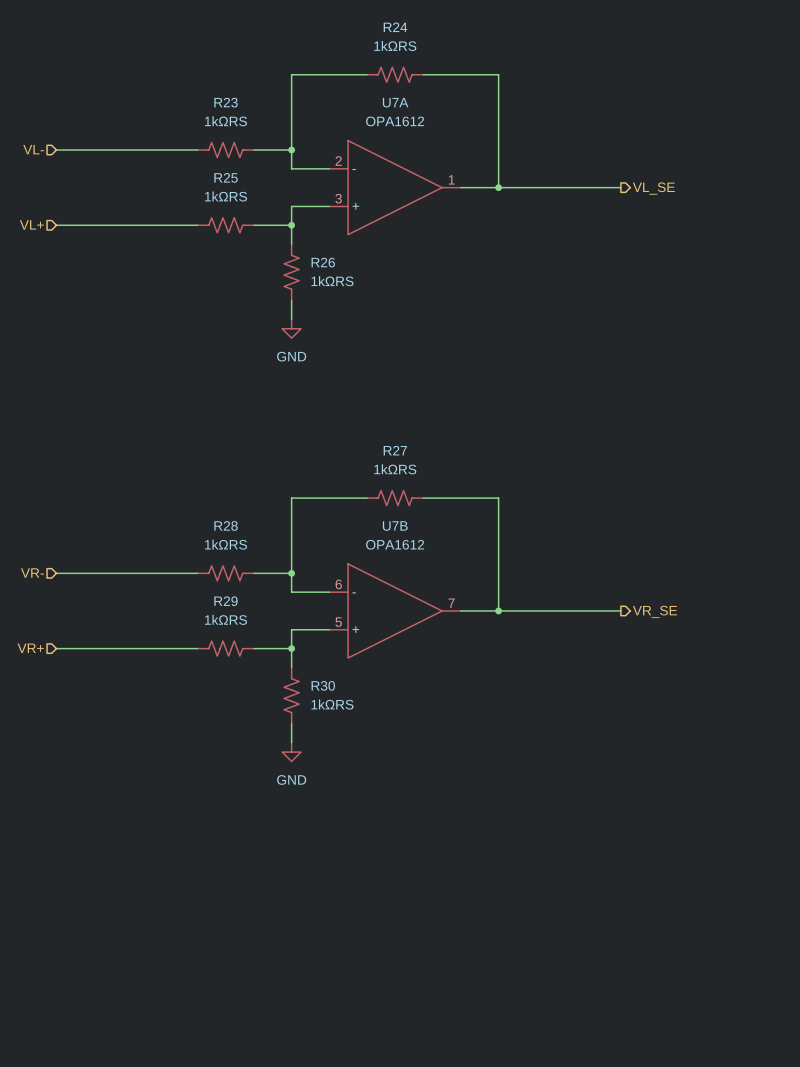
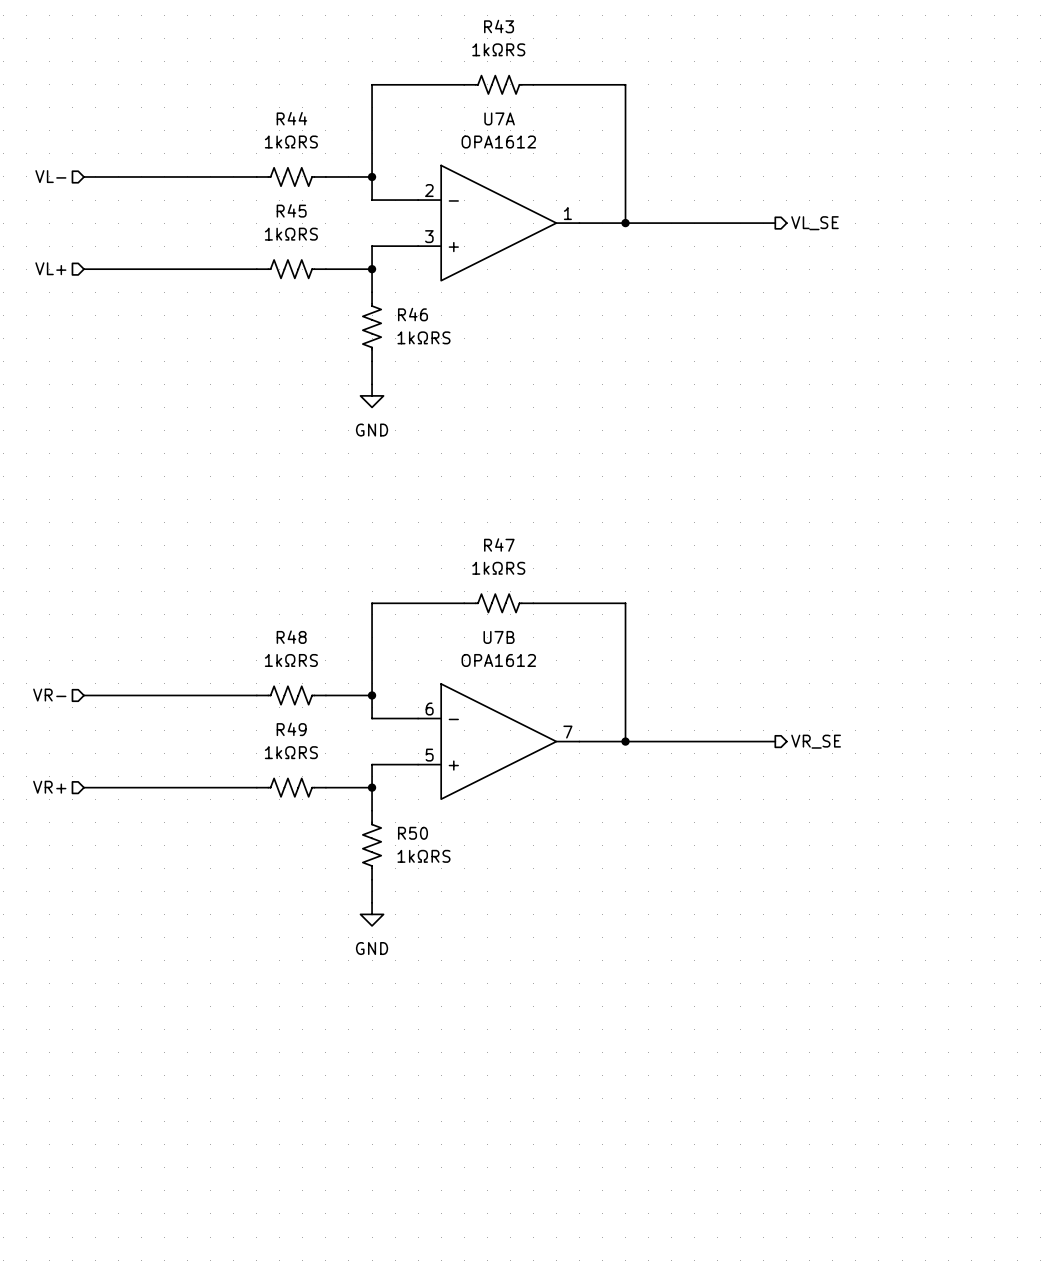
R24 name: R24 (395, 27) -> R43 (499, 26)
R23 name: R23 (226, 102) -> R44 (291, 118)
R25 name: R25 (226, 177) -> R45 (291, 210)
R26 name: R26 (323, 262) -> R46 (412, 314)
R27 name: R27 (395, 450) -> R47 (499, 544)
R28 name: R28 (226, 525) -> R48 (291, 637)
R29 name: R29 (226, 601) -> R49 (291, 729)
R30 name: R30 (323, 685) -> R50 (412, 833)

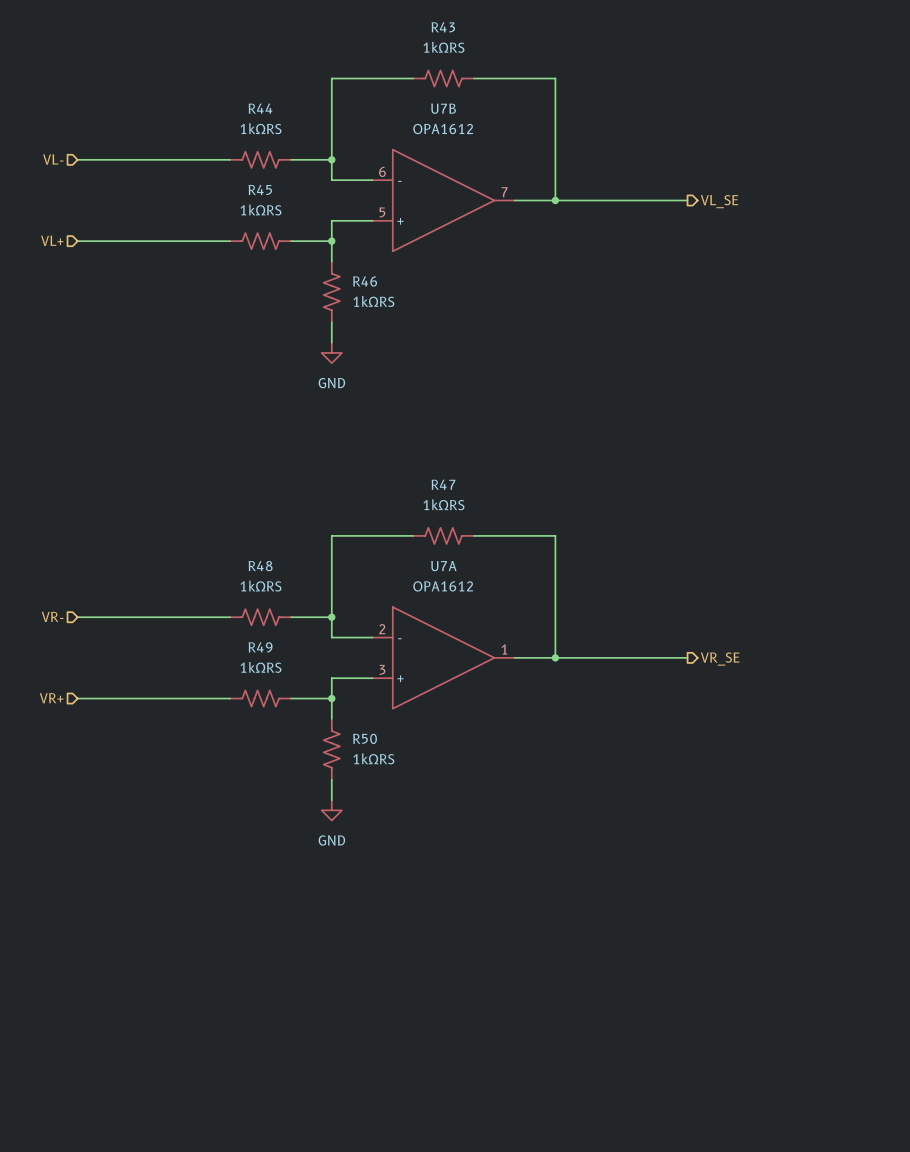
U7A position: (498, 223) -> (443, 657)
U7B position: (498, 741) -> (443, 200)

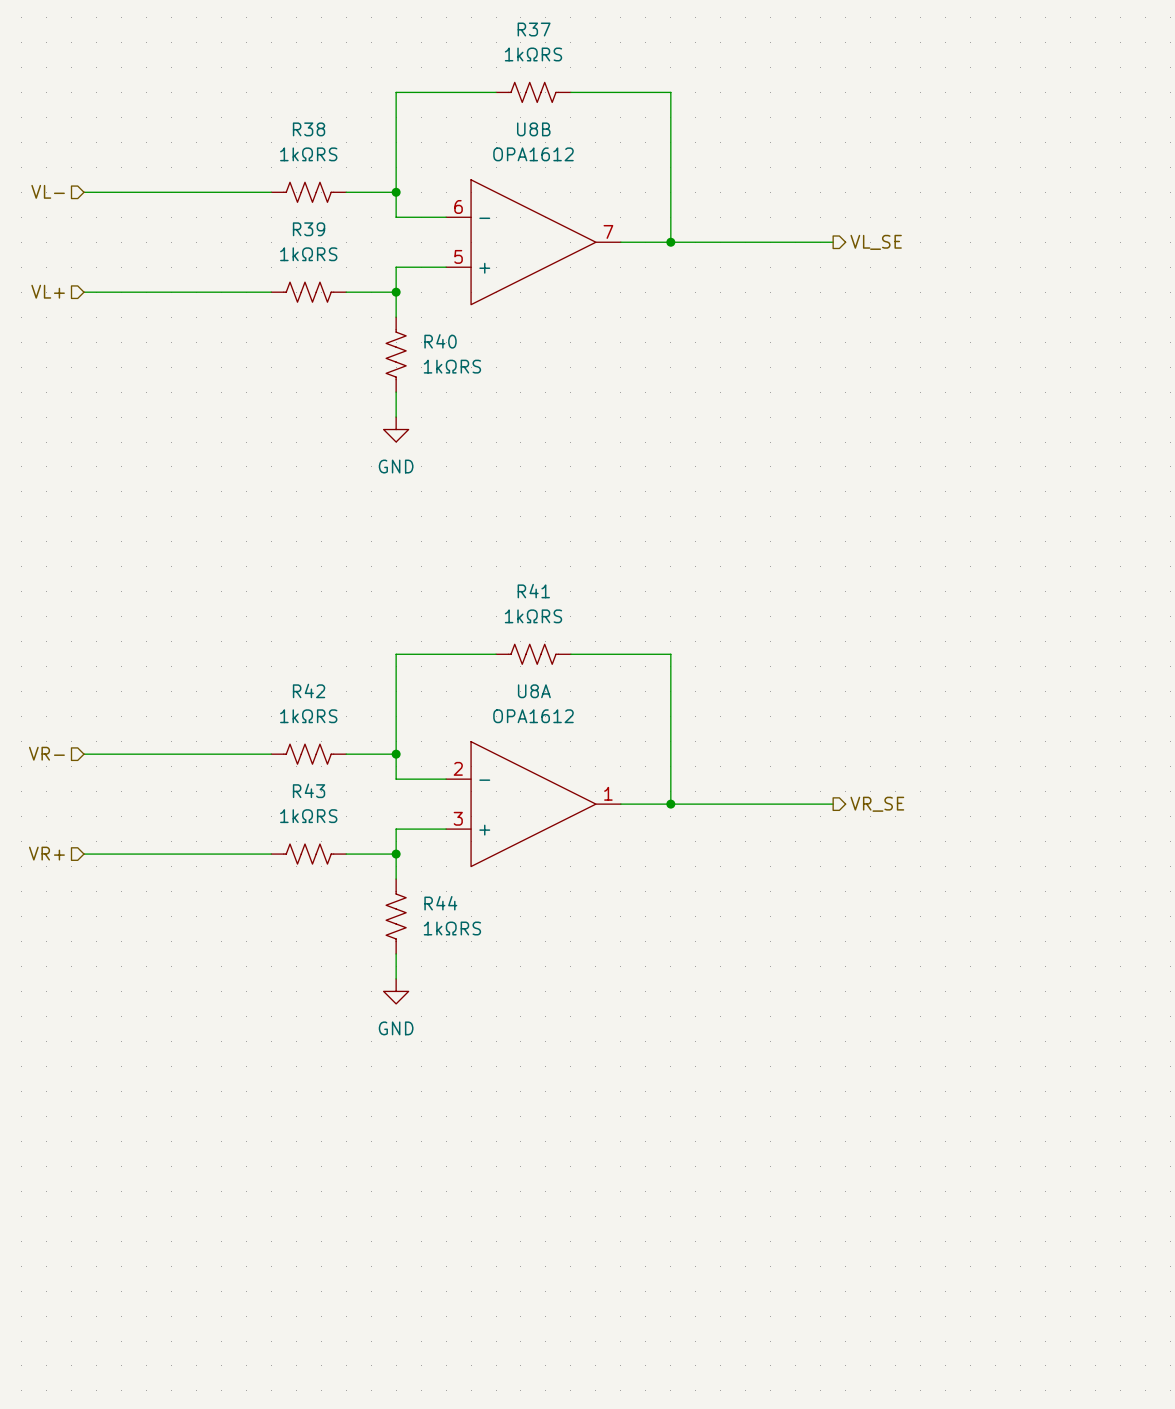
R43 name: R43 (443, 27) -> R37 (534, 29)
R44 name: R44 (260, 108) -> R38 (309, 129)
U7B name: U7B (443, 108) -> U8B (533, 129)
R45 name: R45 (260, 189) -> R39 (309, 229)
R46 name: R46 (365, 281) -> R40 (440, 341)
R47 name: R47 (443, 484) -> R41 (533, 591)
R48 name: R48 (260, 566) -> R42 (309, 690)
U7A name: U7A (443, 566) -> U8A (534, 691)
R49 name: R49 (260, 647) -> R43 (309, 790)
R50 name: R50 (365, 738) -> R44 (440, 903)

